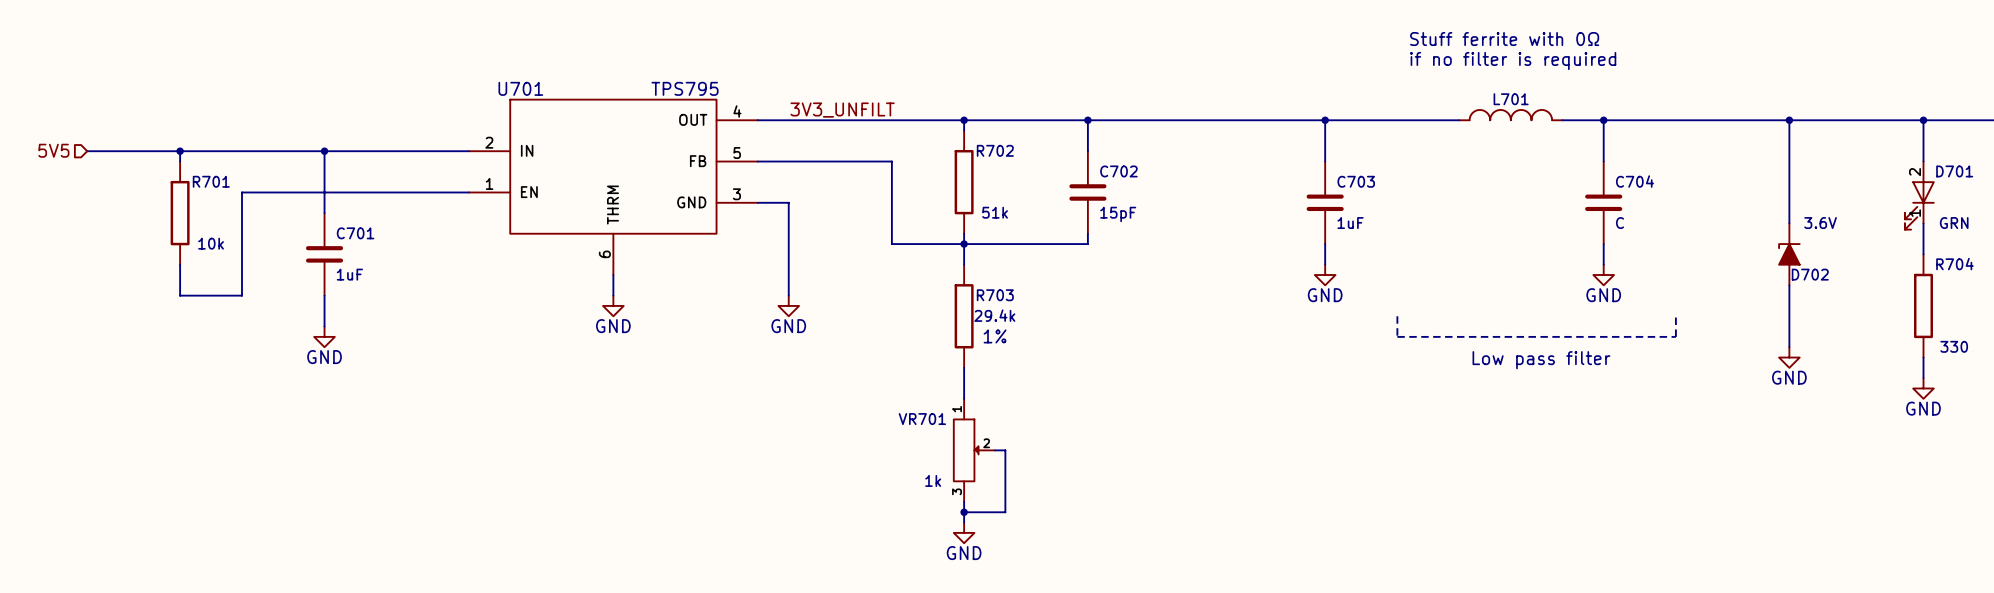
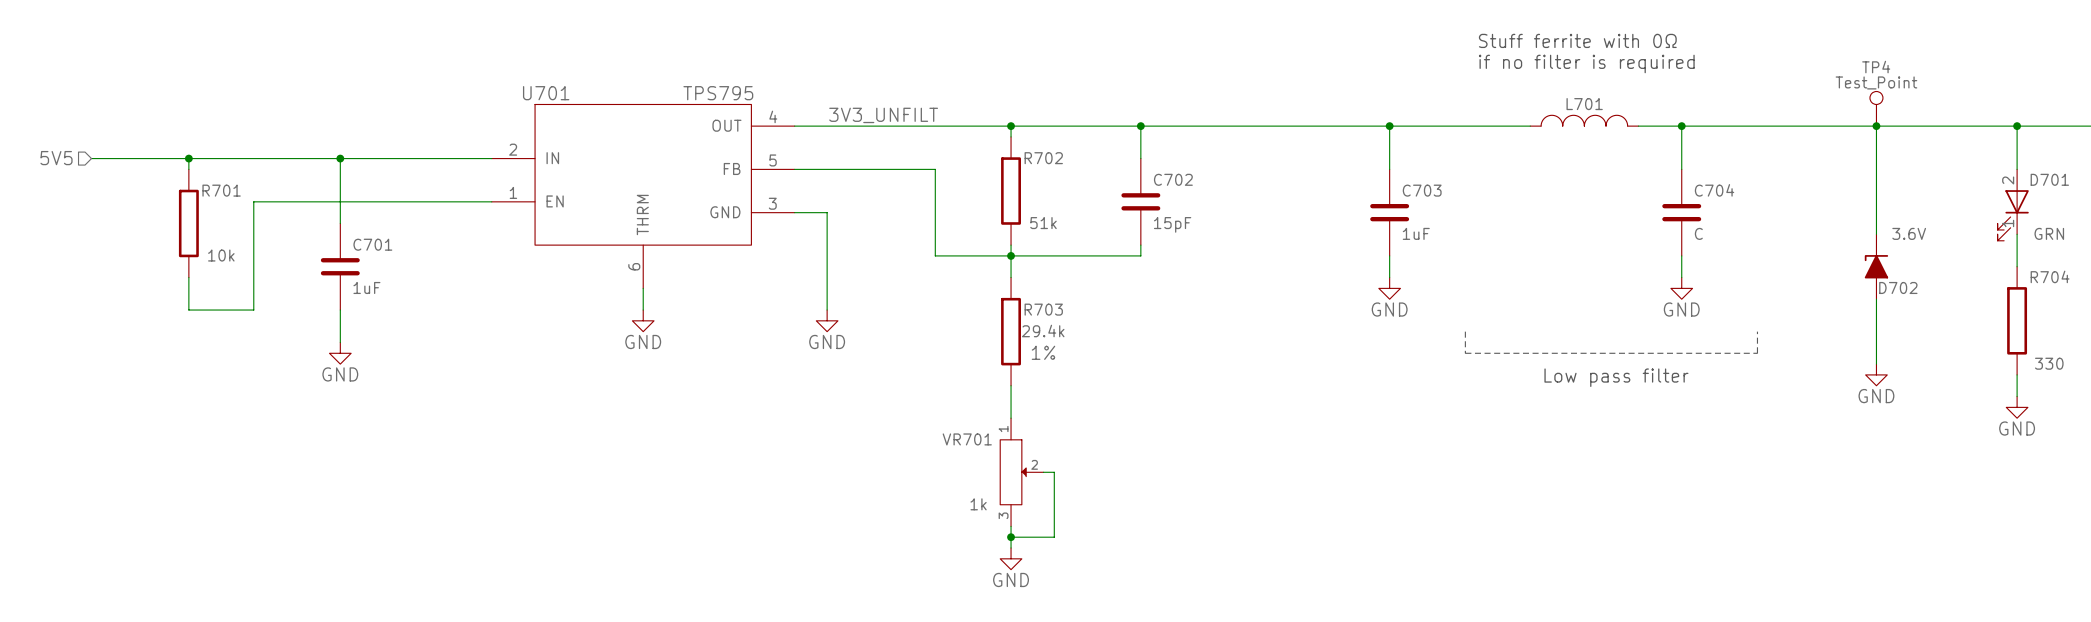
TP4: none -> Test_Point (1876, 108)

